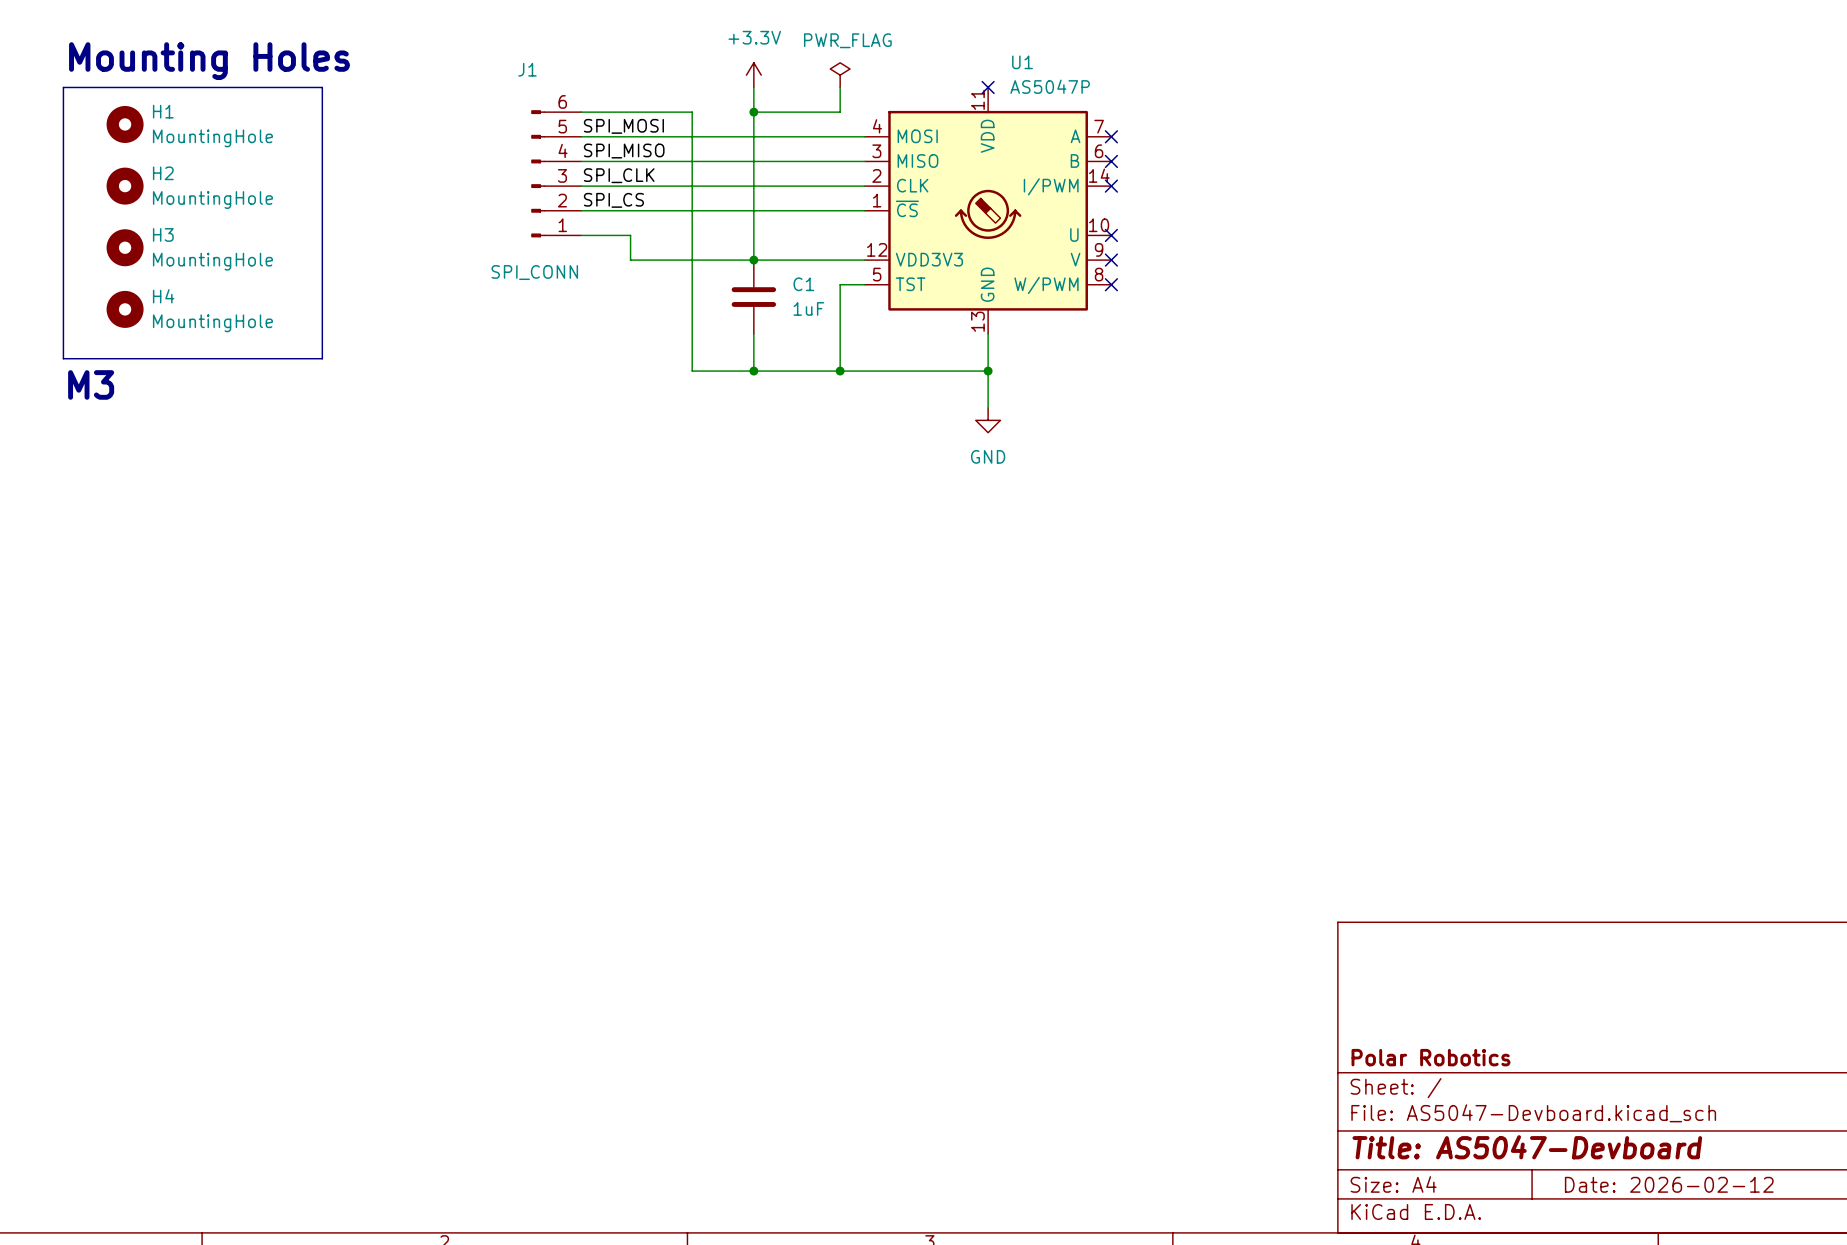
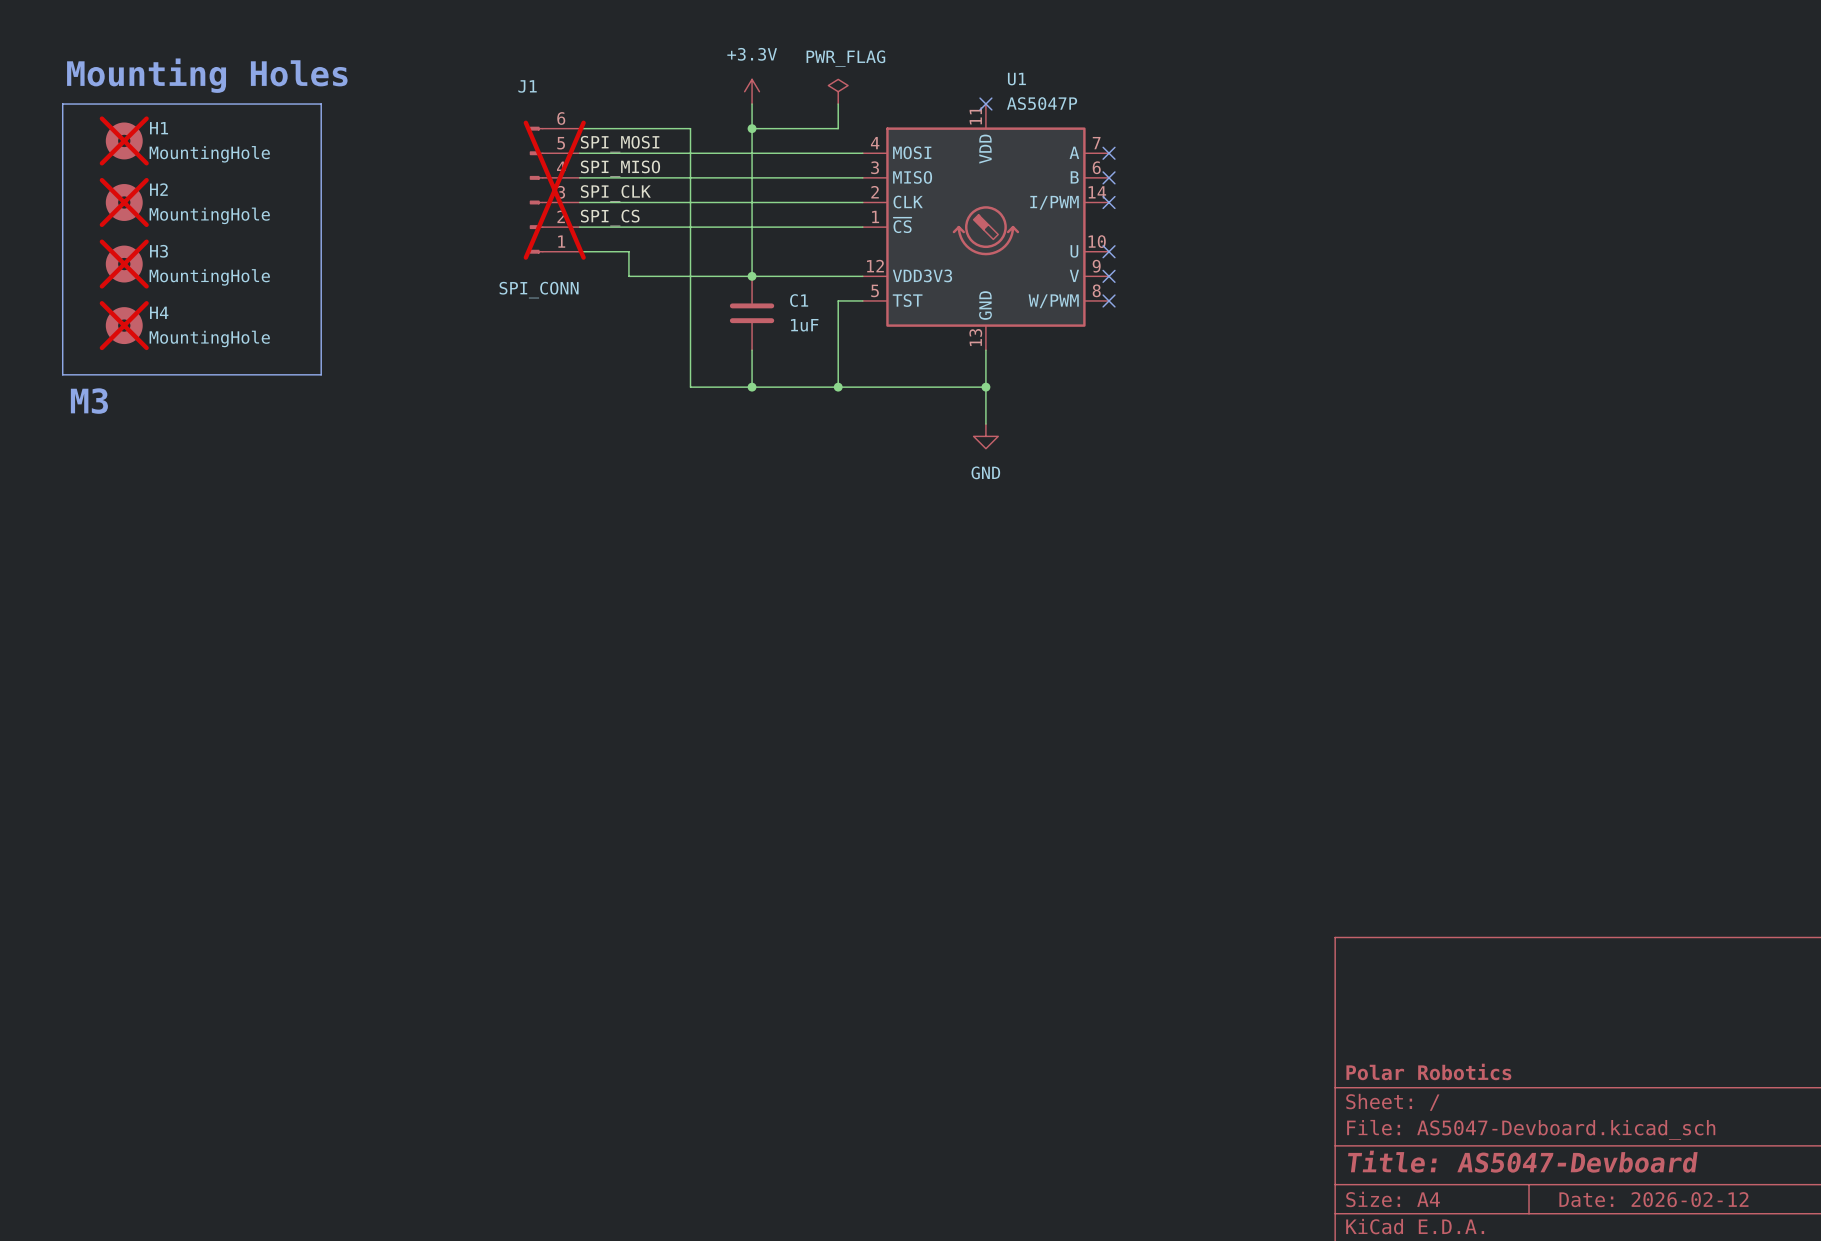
H1 do-not-place cross: none -> (124, 140)
J1 do-not-place cross: none -> (554, 190)
H2 do-not-place cross: none -> (124, 202)
H3 do-not-place cross: none -> (124, 264)
H4 do-not-place cross: none -> (124, 325)

